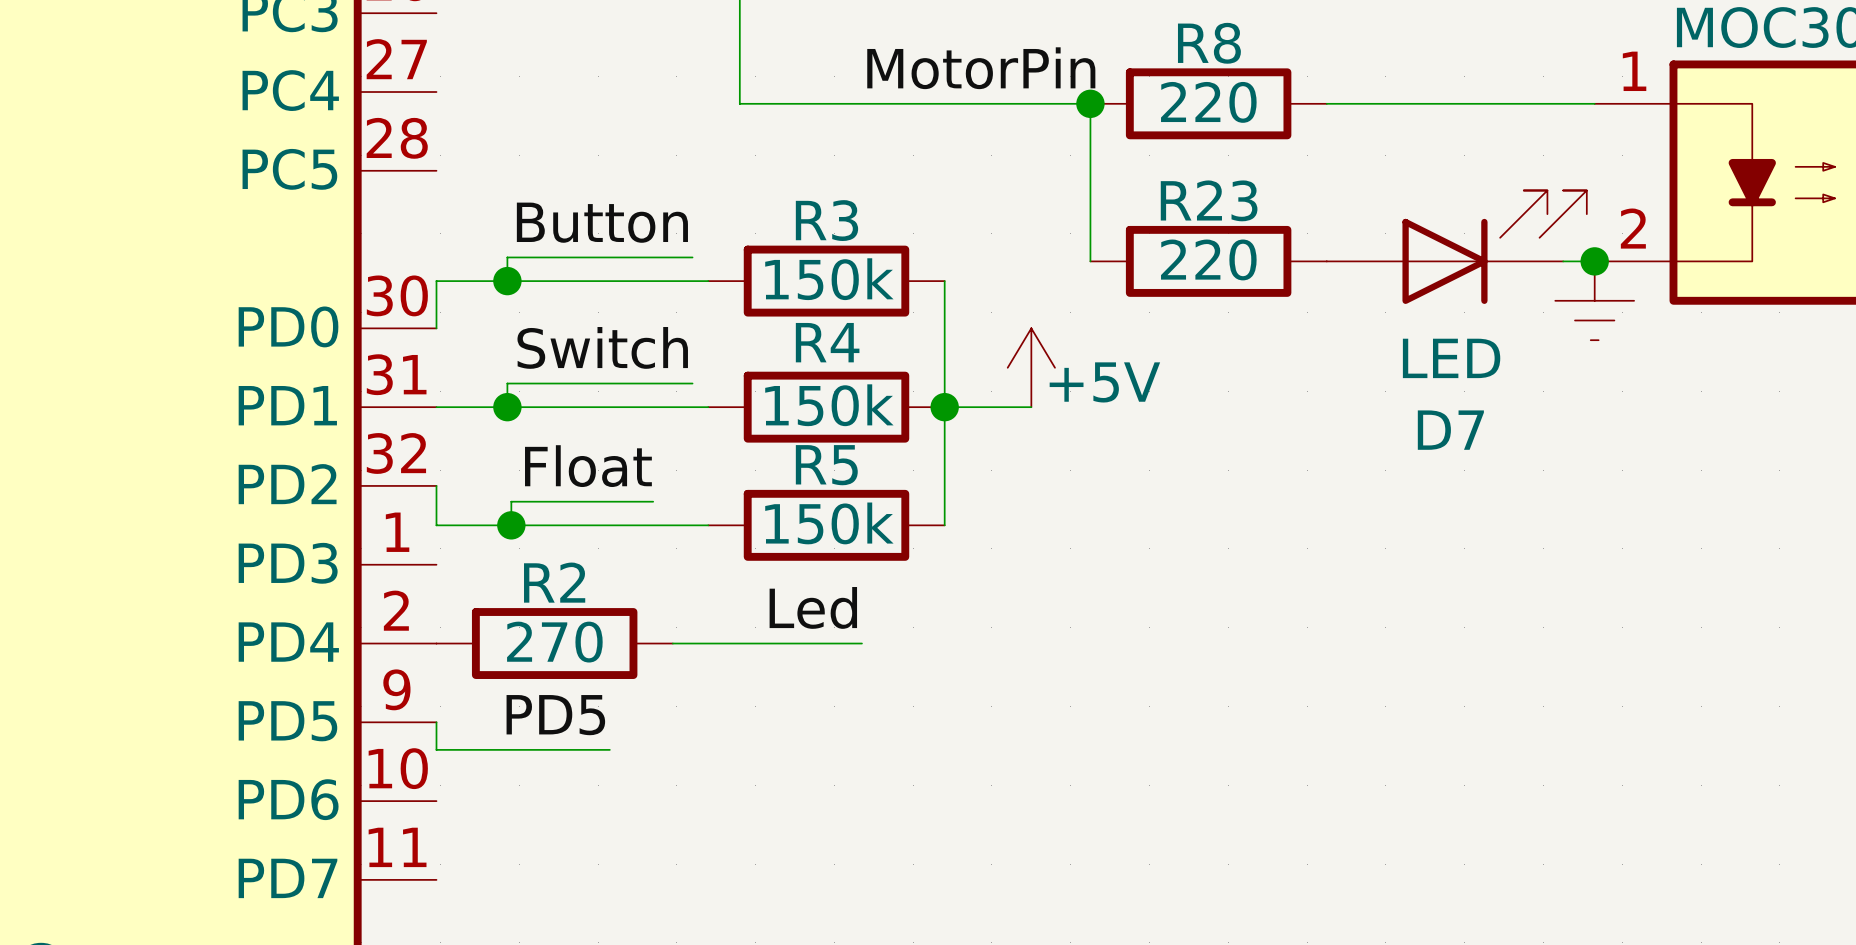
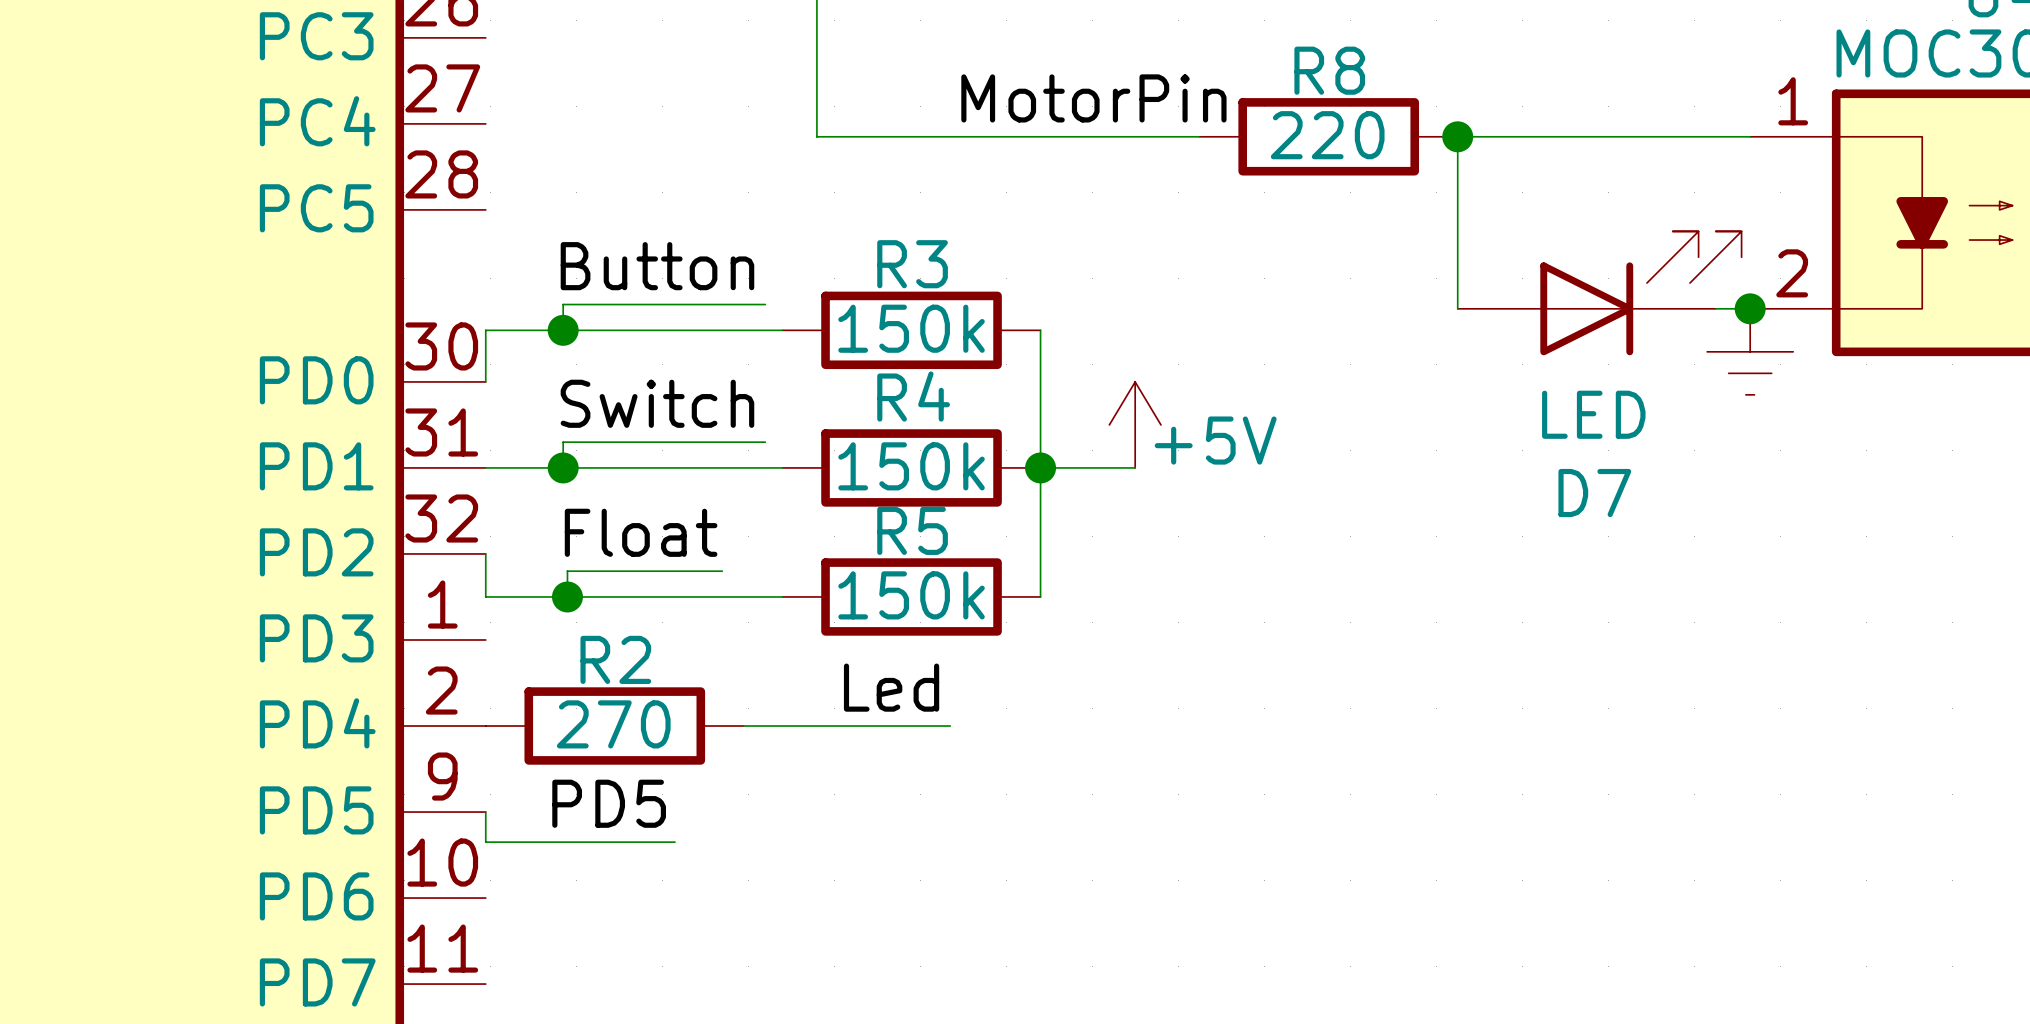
wire: (1090, 103) (1090, 261) -> (1457, 136) (1457, 308)
junction: (1090, 103) -> none
junction: none -> (1457, 136)
R23: 220 (1208, 261) -> none

